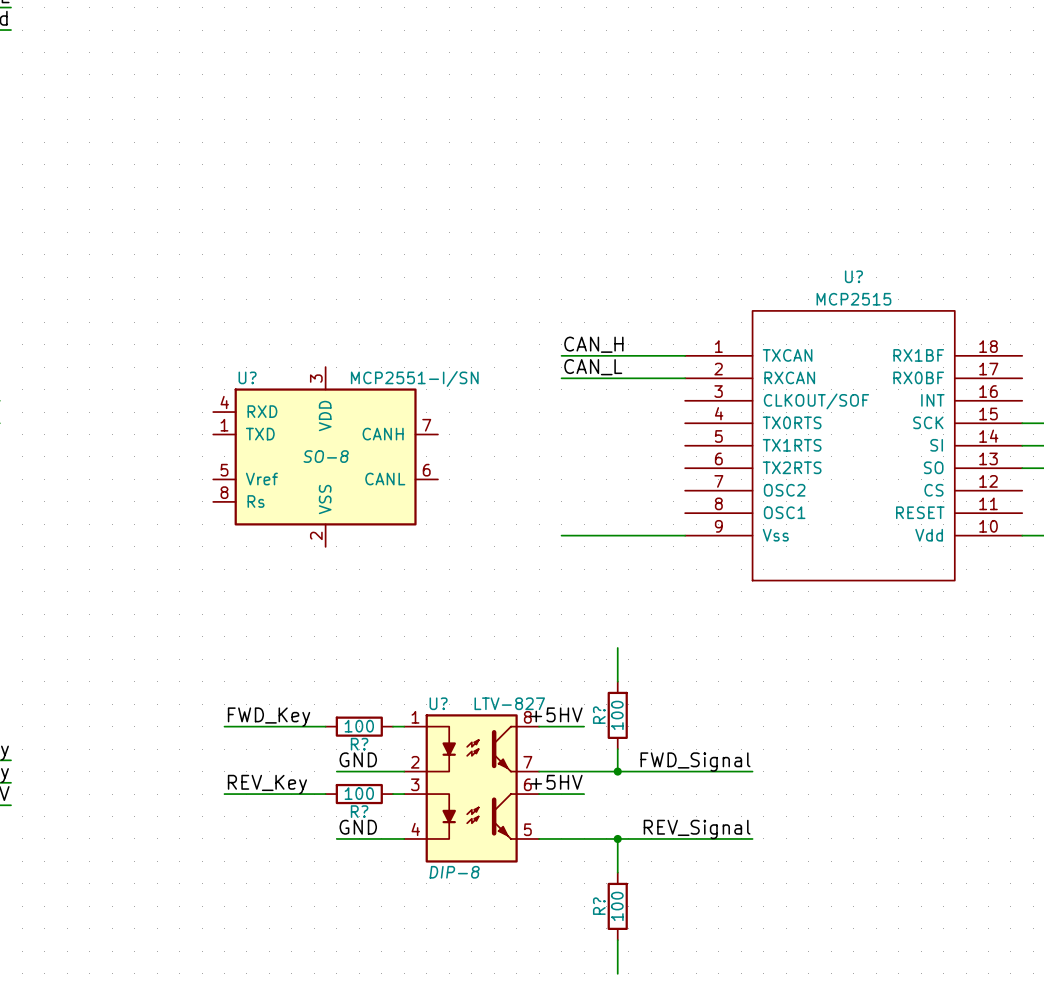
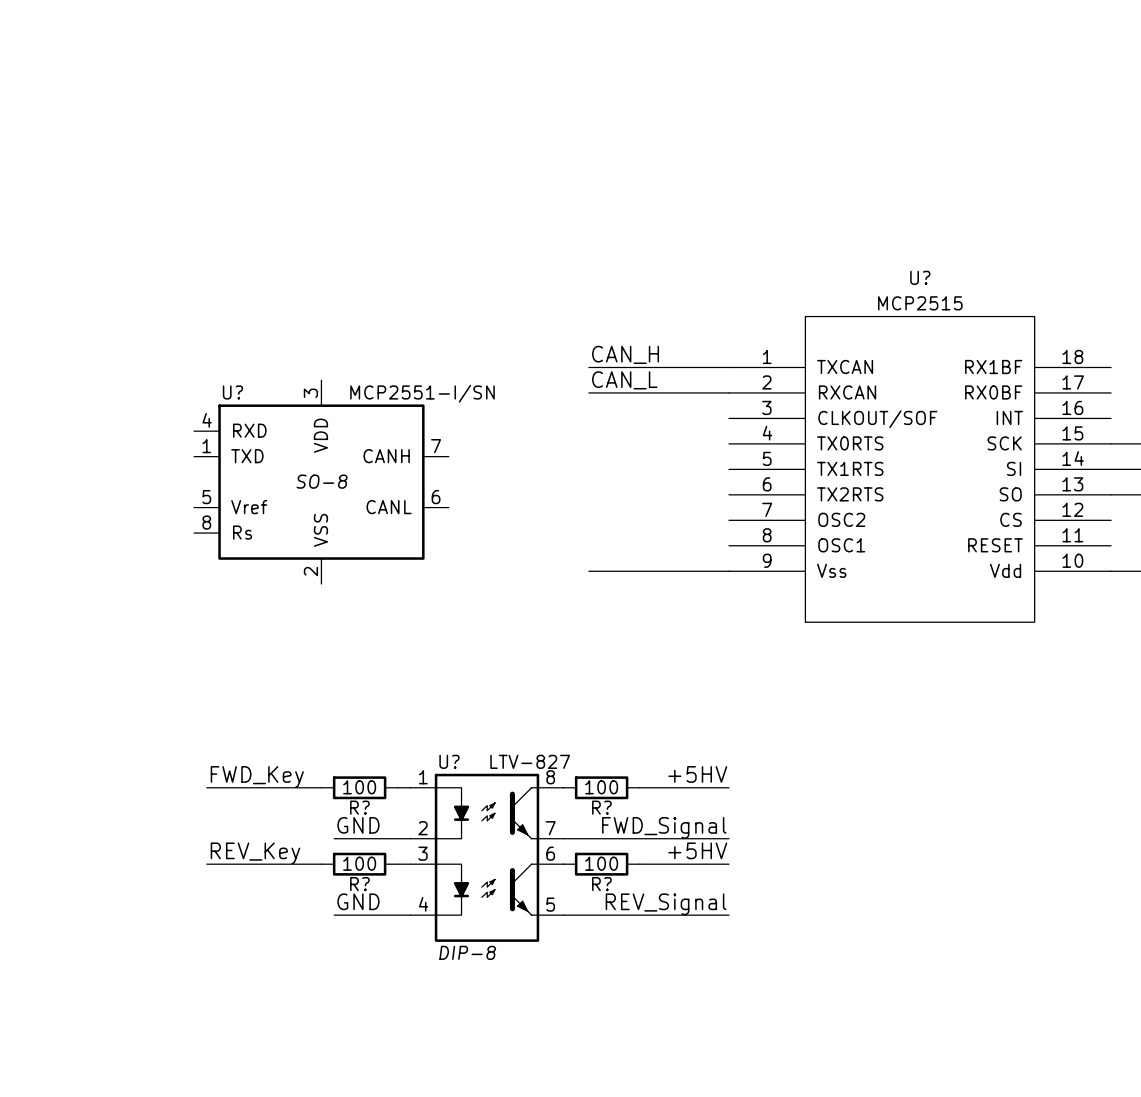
wire: (617, 647) (617, 681) -> none
label: +5HV (556, 714) -> none
label: none -> +5HV (697, 774)
R?: 100 (617, 715) -> none
wire: (539, 726) (584, 726) -> none
R?: none -> 100 (601, 787)
wire: none -> (639, 787) (728, 787)
wire: (617, 749) (617, 771) -> none
label position: FWD_Signal (695, 762) -> FWD_Signal (664, 827)
junction: (617, 771) -> none
wire: (685, 771) (752, 771) -> none
label: +5HV (556, 782) -> none
label: none -> +5HV (697, 850)
wire: (539, 794) (584, 794) -> none
R?: none -> 100 (601, 864)
wire: none -> (639, 864) (728, 864)
label position: REV_Signal (697, 829) -> REV_Signal (666, 904)
wire: (617, 838) (617, 872) -> none
junction: (617, 838) -> none
wire: (685, 838) (752, 838) -> none
R?: 100 (617, 906) -> none
wire: (617, 940) (617, 973) -> none

